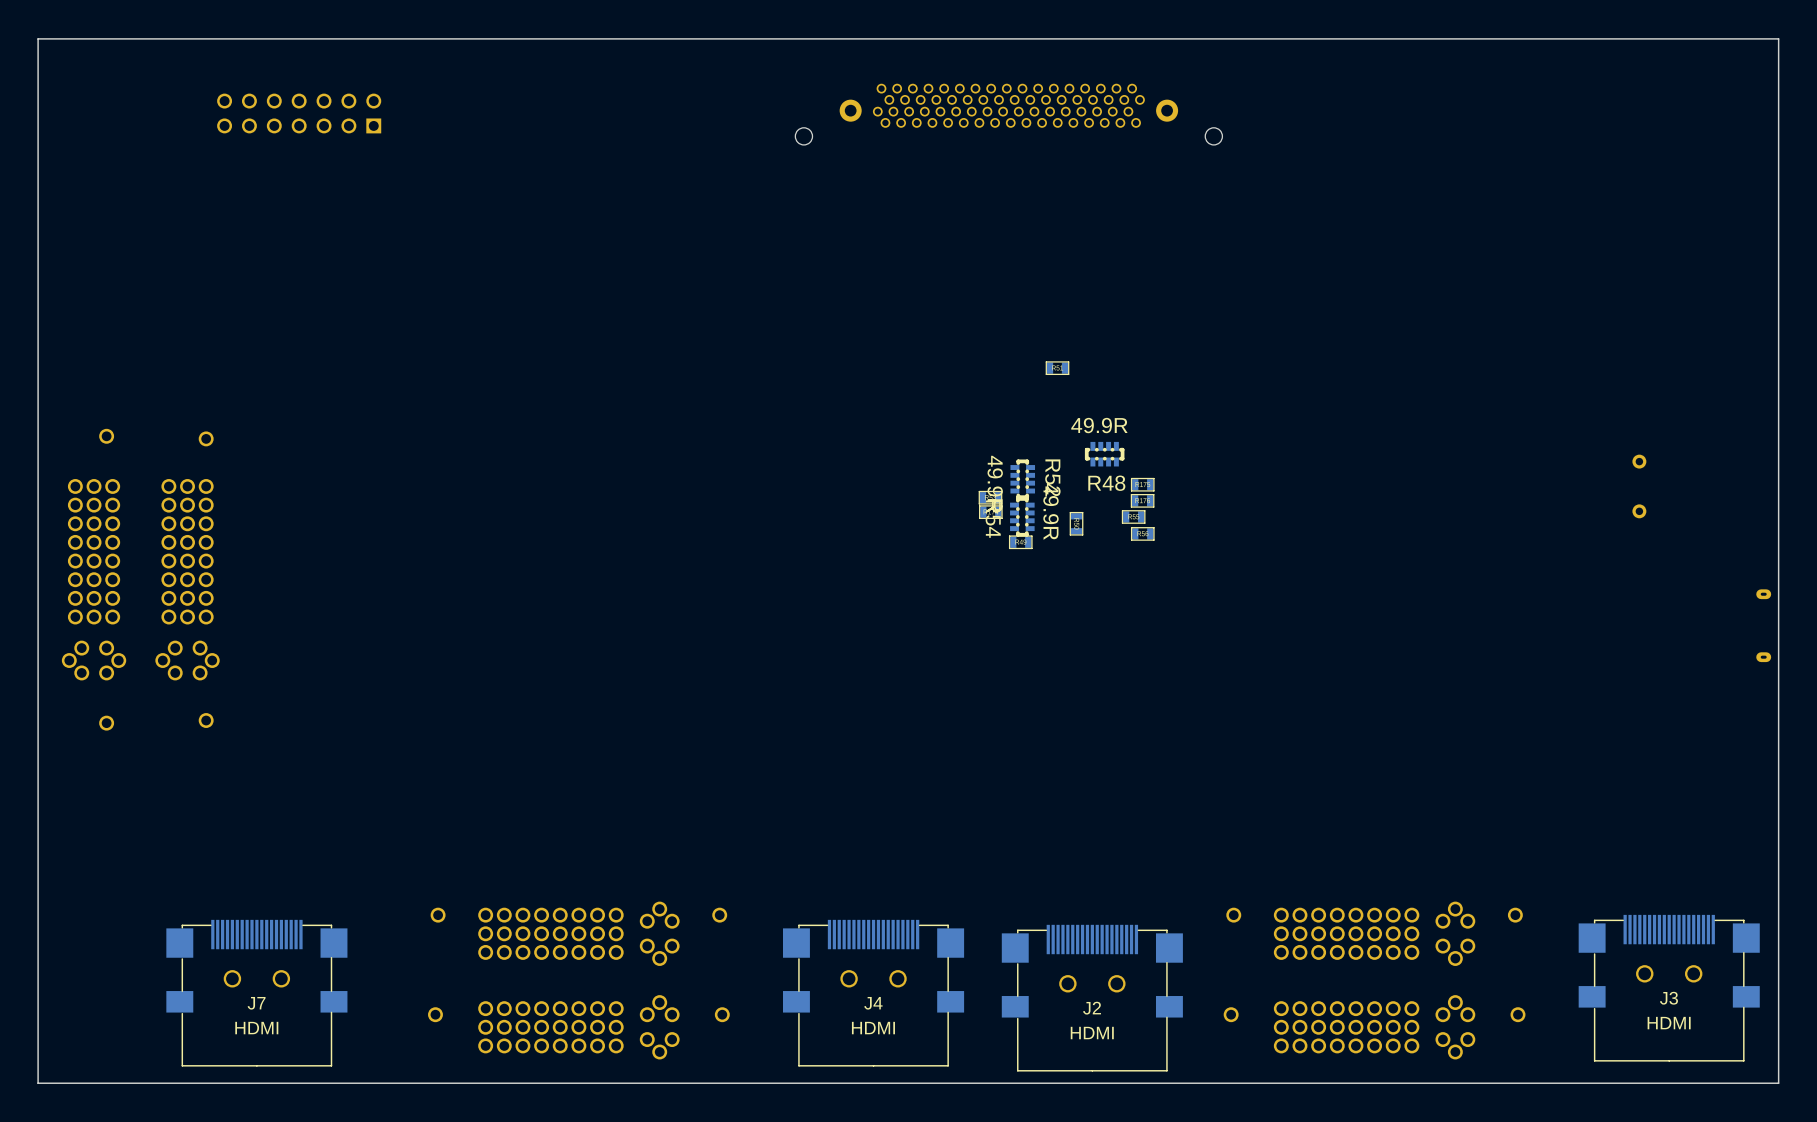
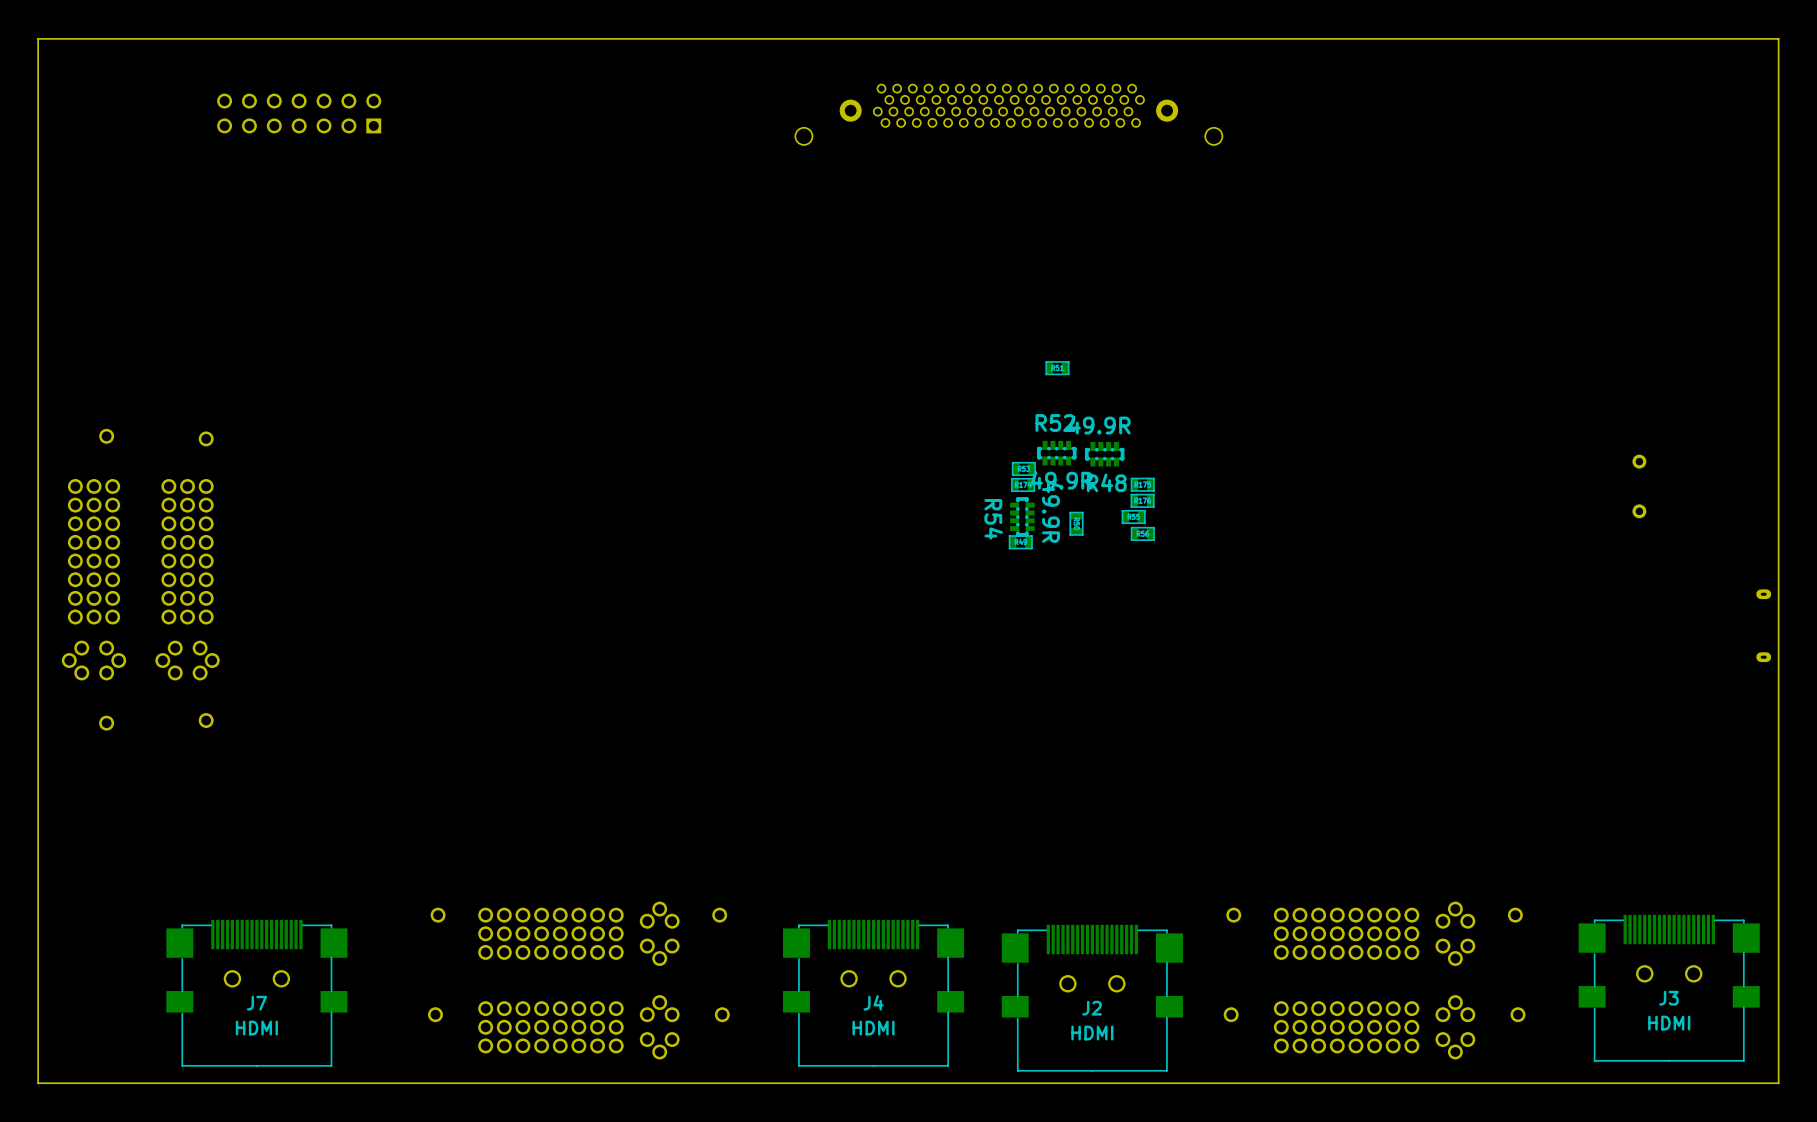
R52 rotation: 0° (1022, 479) -> 90° counterclockwise (1056, 453)
R52 position: (1022, 479) -> (1056, 453)
part position: (990, 497) -> (1023, 468)
part position: (990, 512) -> (1023, 484)

